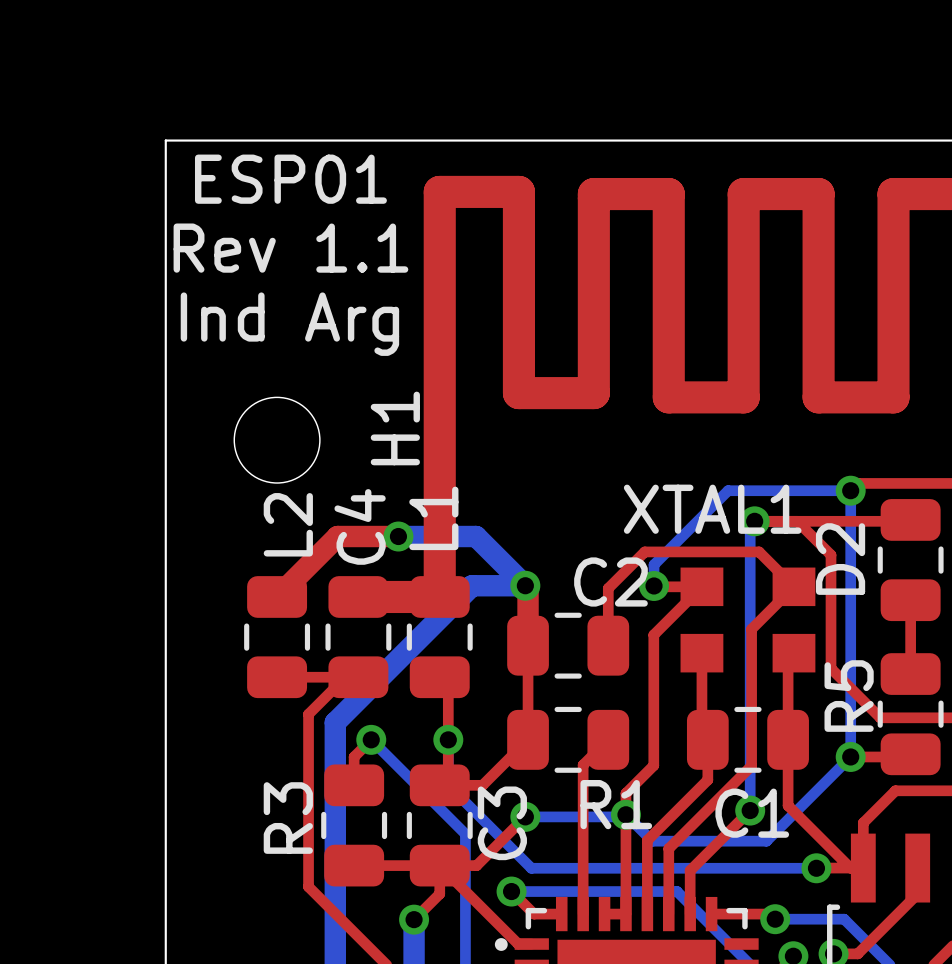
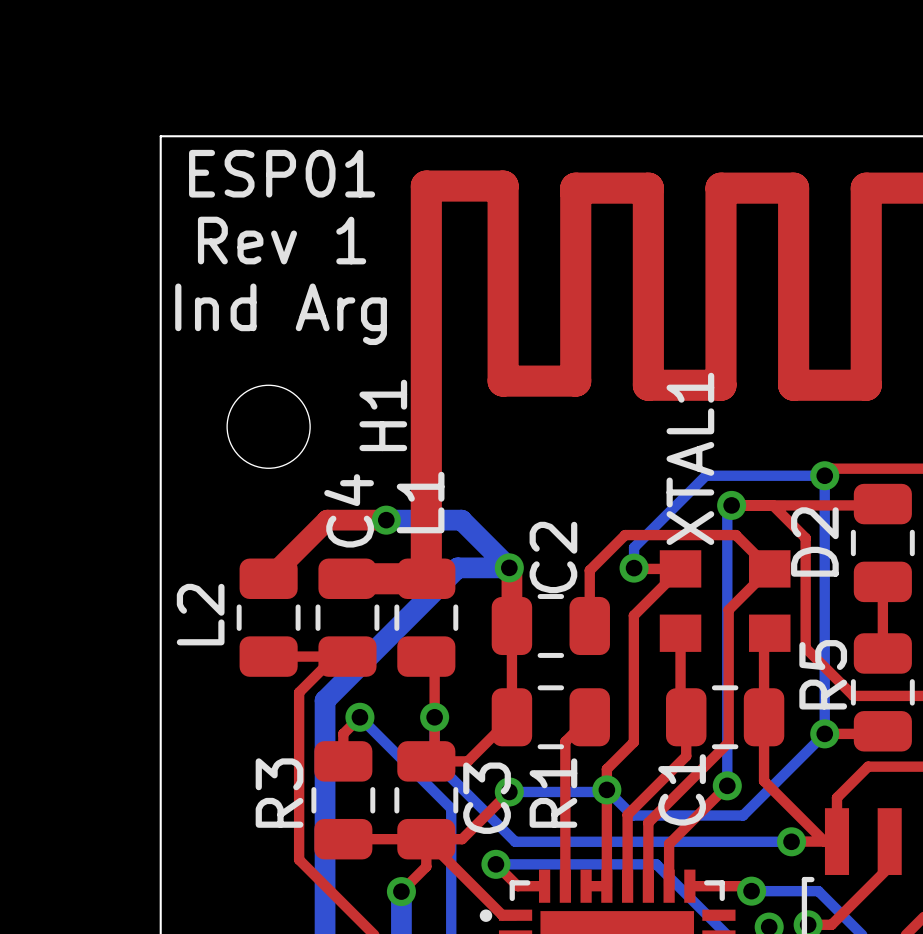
text: Rev 1.1 (290, 248) -> Rev 1 (282, 240)
XTAL1 name rotation: 0° (712, 509) -> 90° counterclockwise (690, 458)
L2 name position: L2 (288, 524) -> L2 (200, 614)
C2 name rotation: 0° (610, 582) -> 90° counterclockwise (553, 557)
R1 name rotation: 0° (616, 804) -> 90° counterclockwise (553, 793)
C1 name rotation: 0° (752, 813) -> 90° counterclockwise (682, 789)

